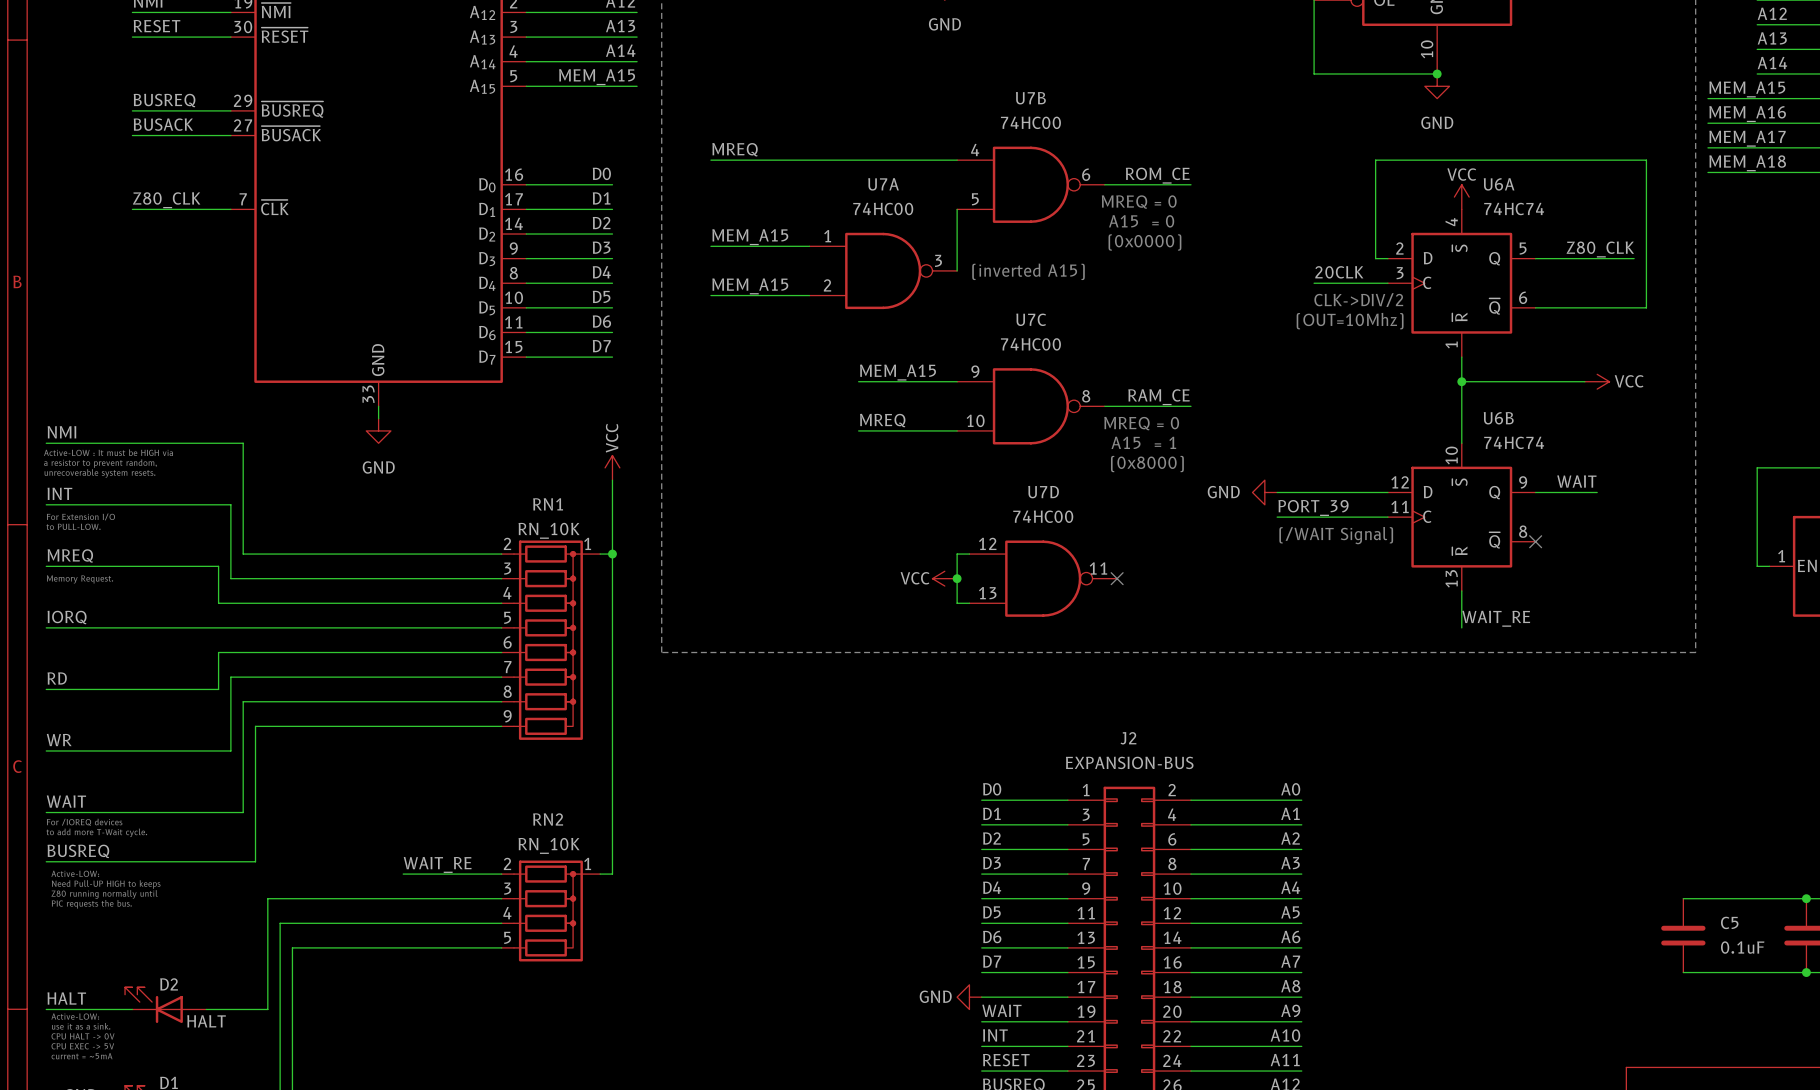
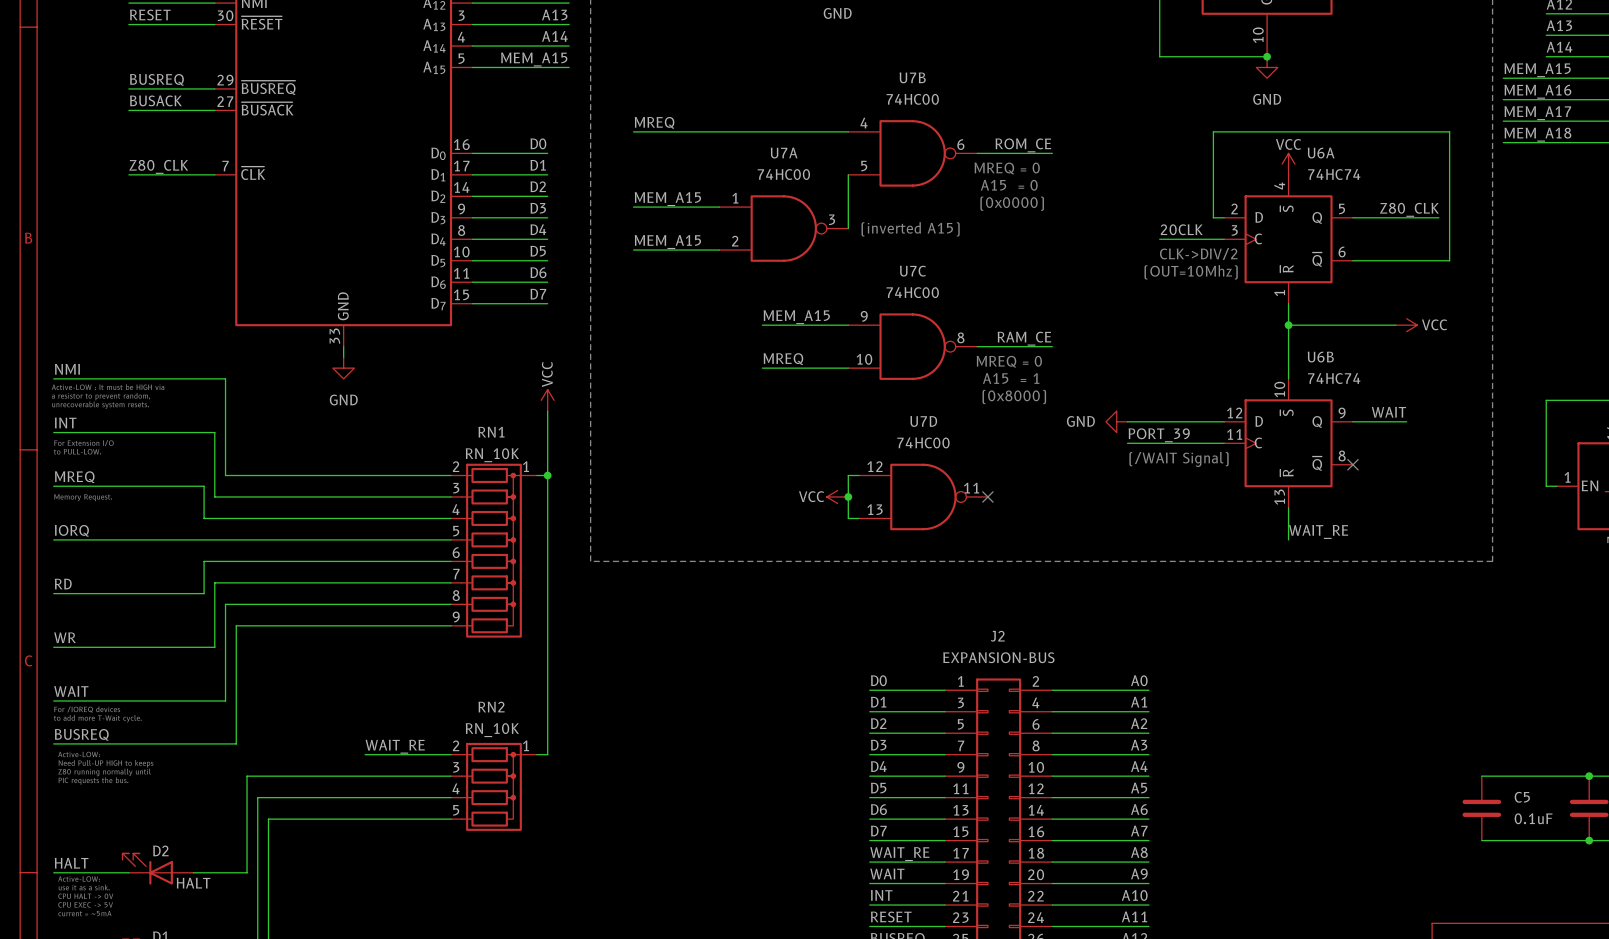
label: none -> WAIT_RE (899, 854)
power symbol: GND (969, 997) -> none

